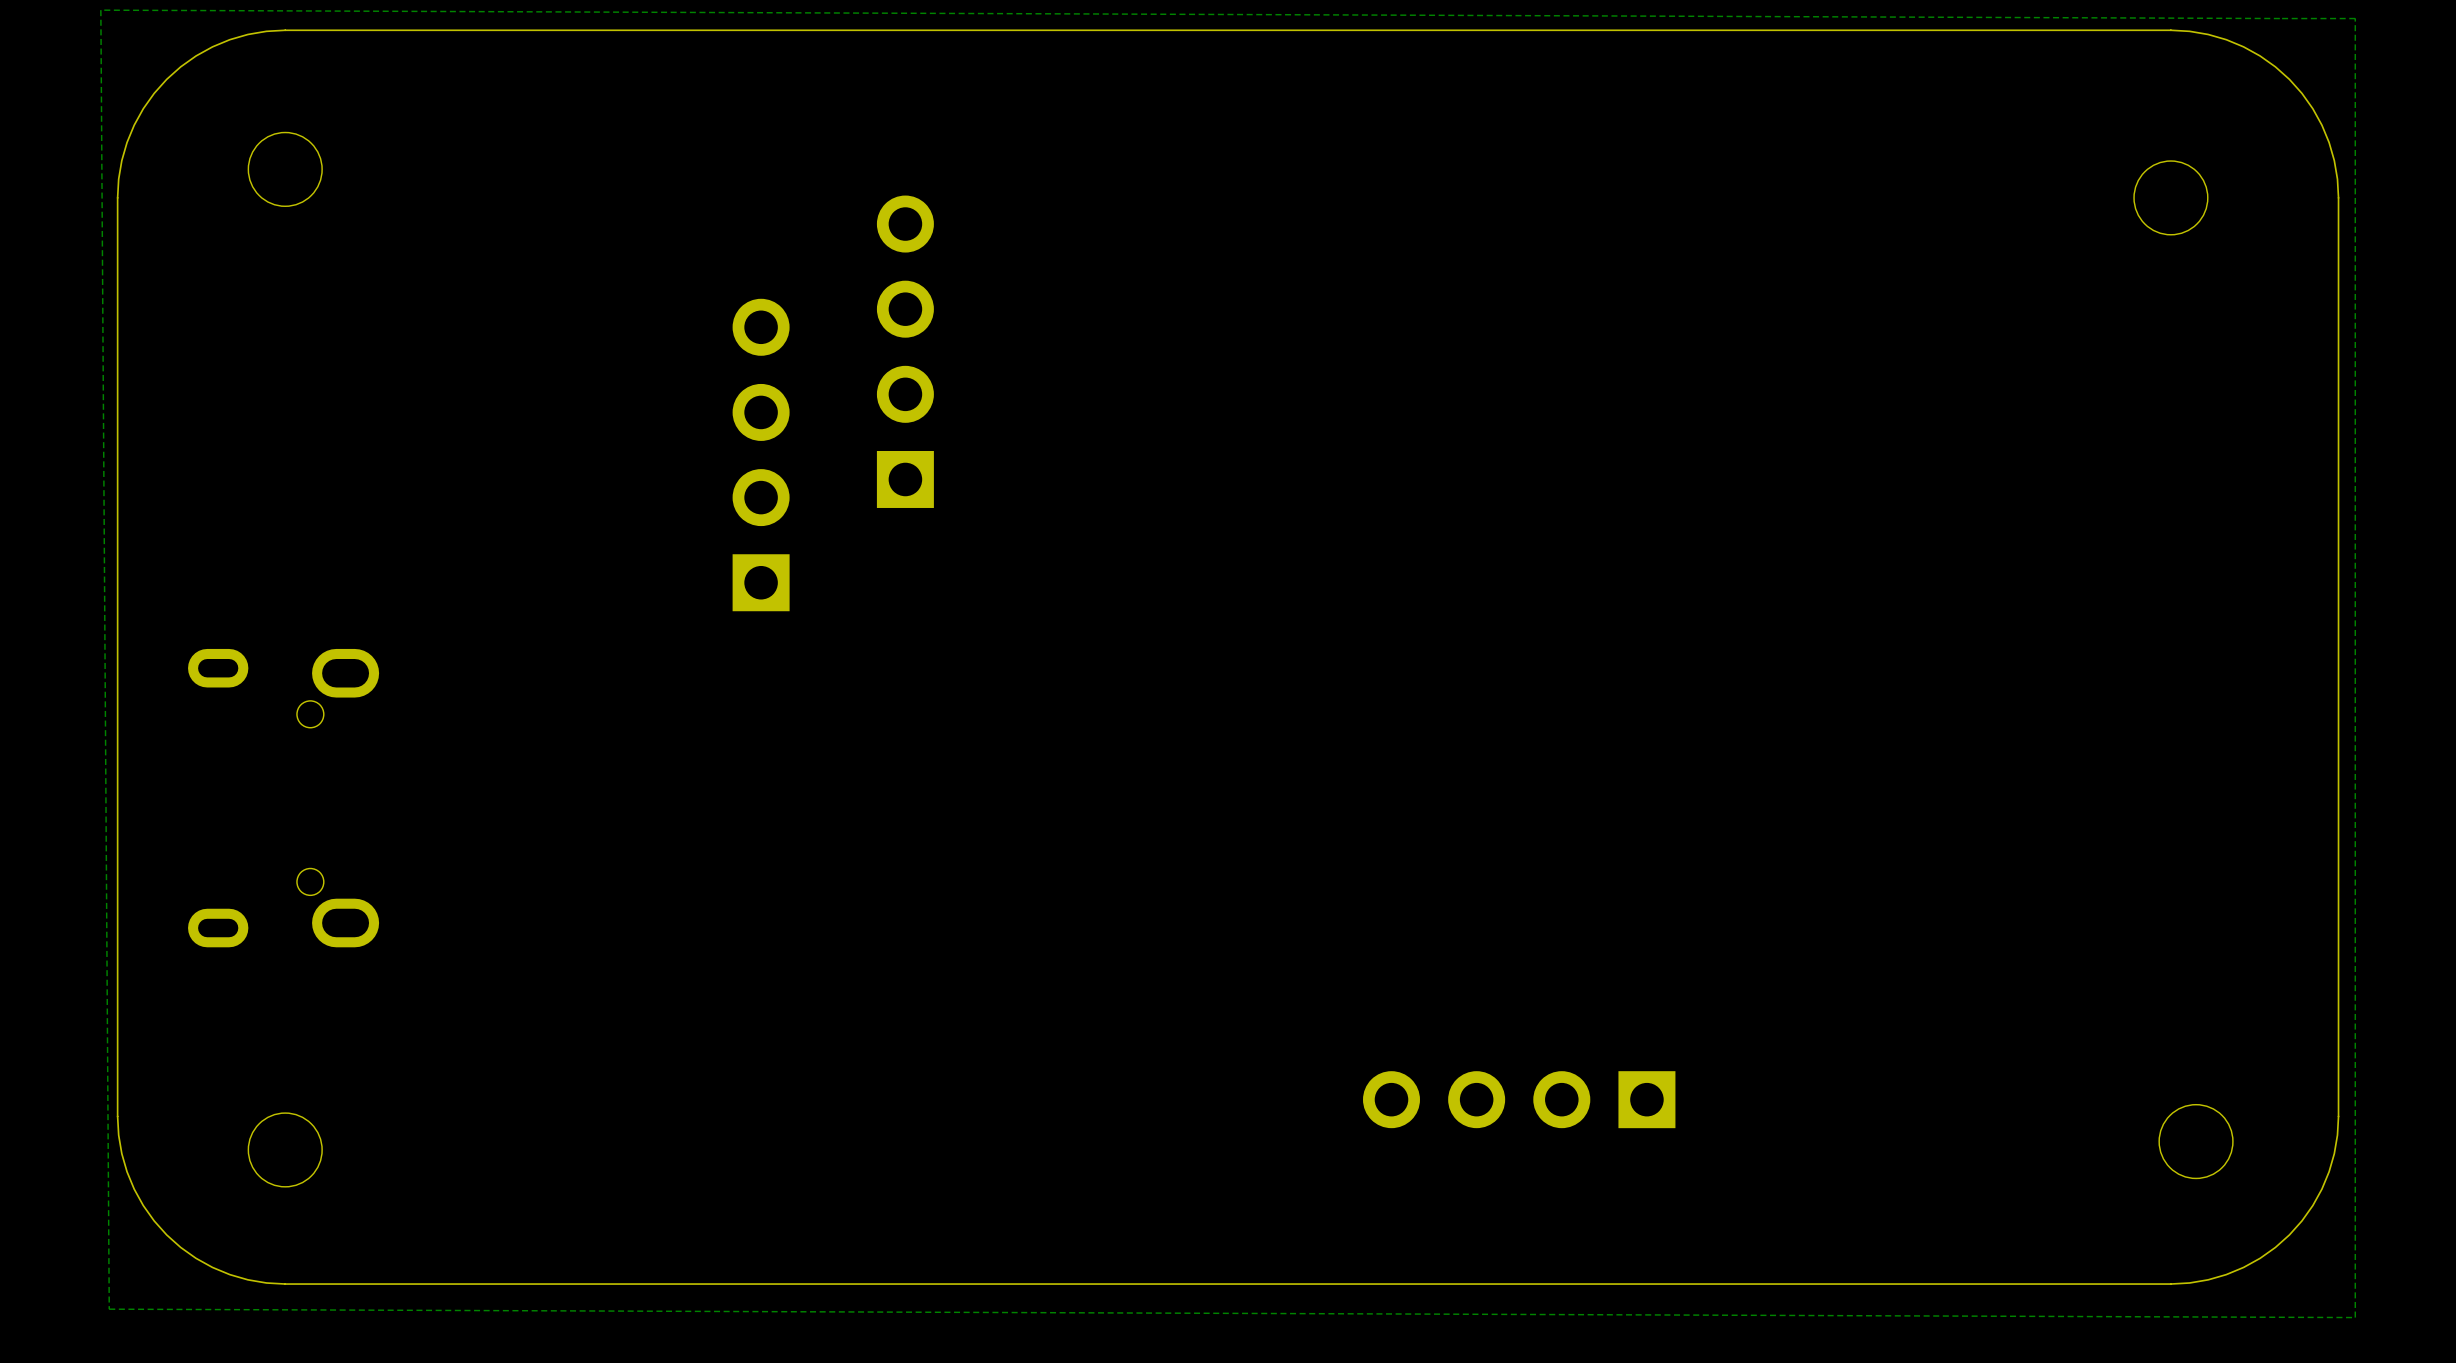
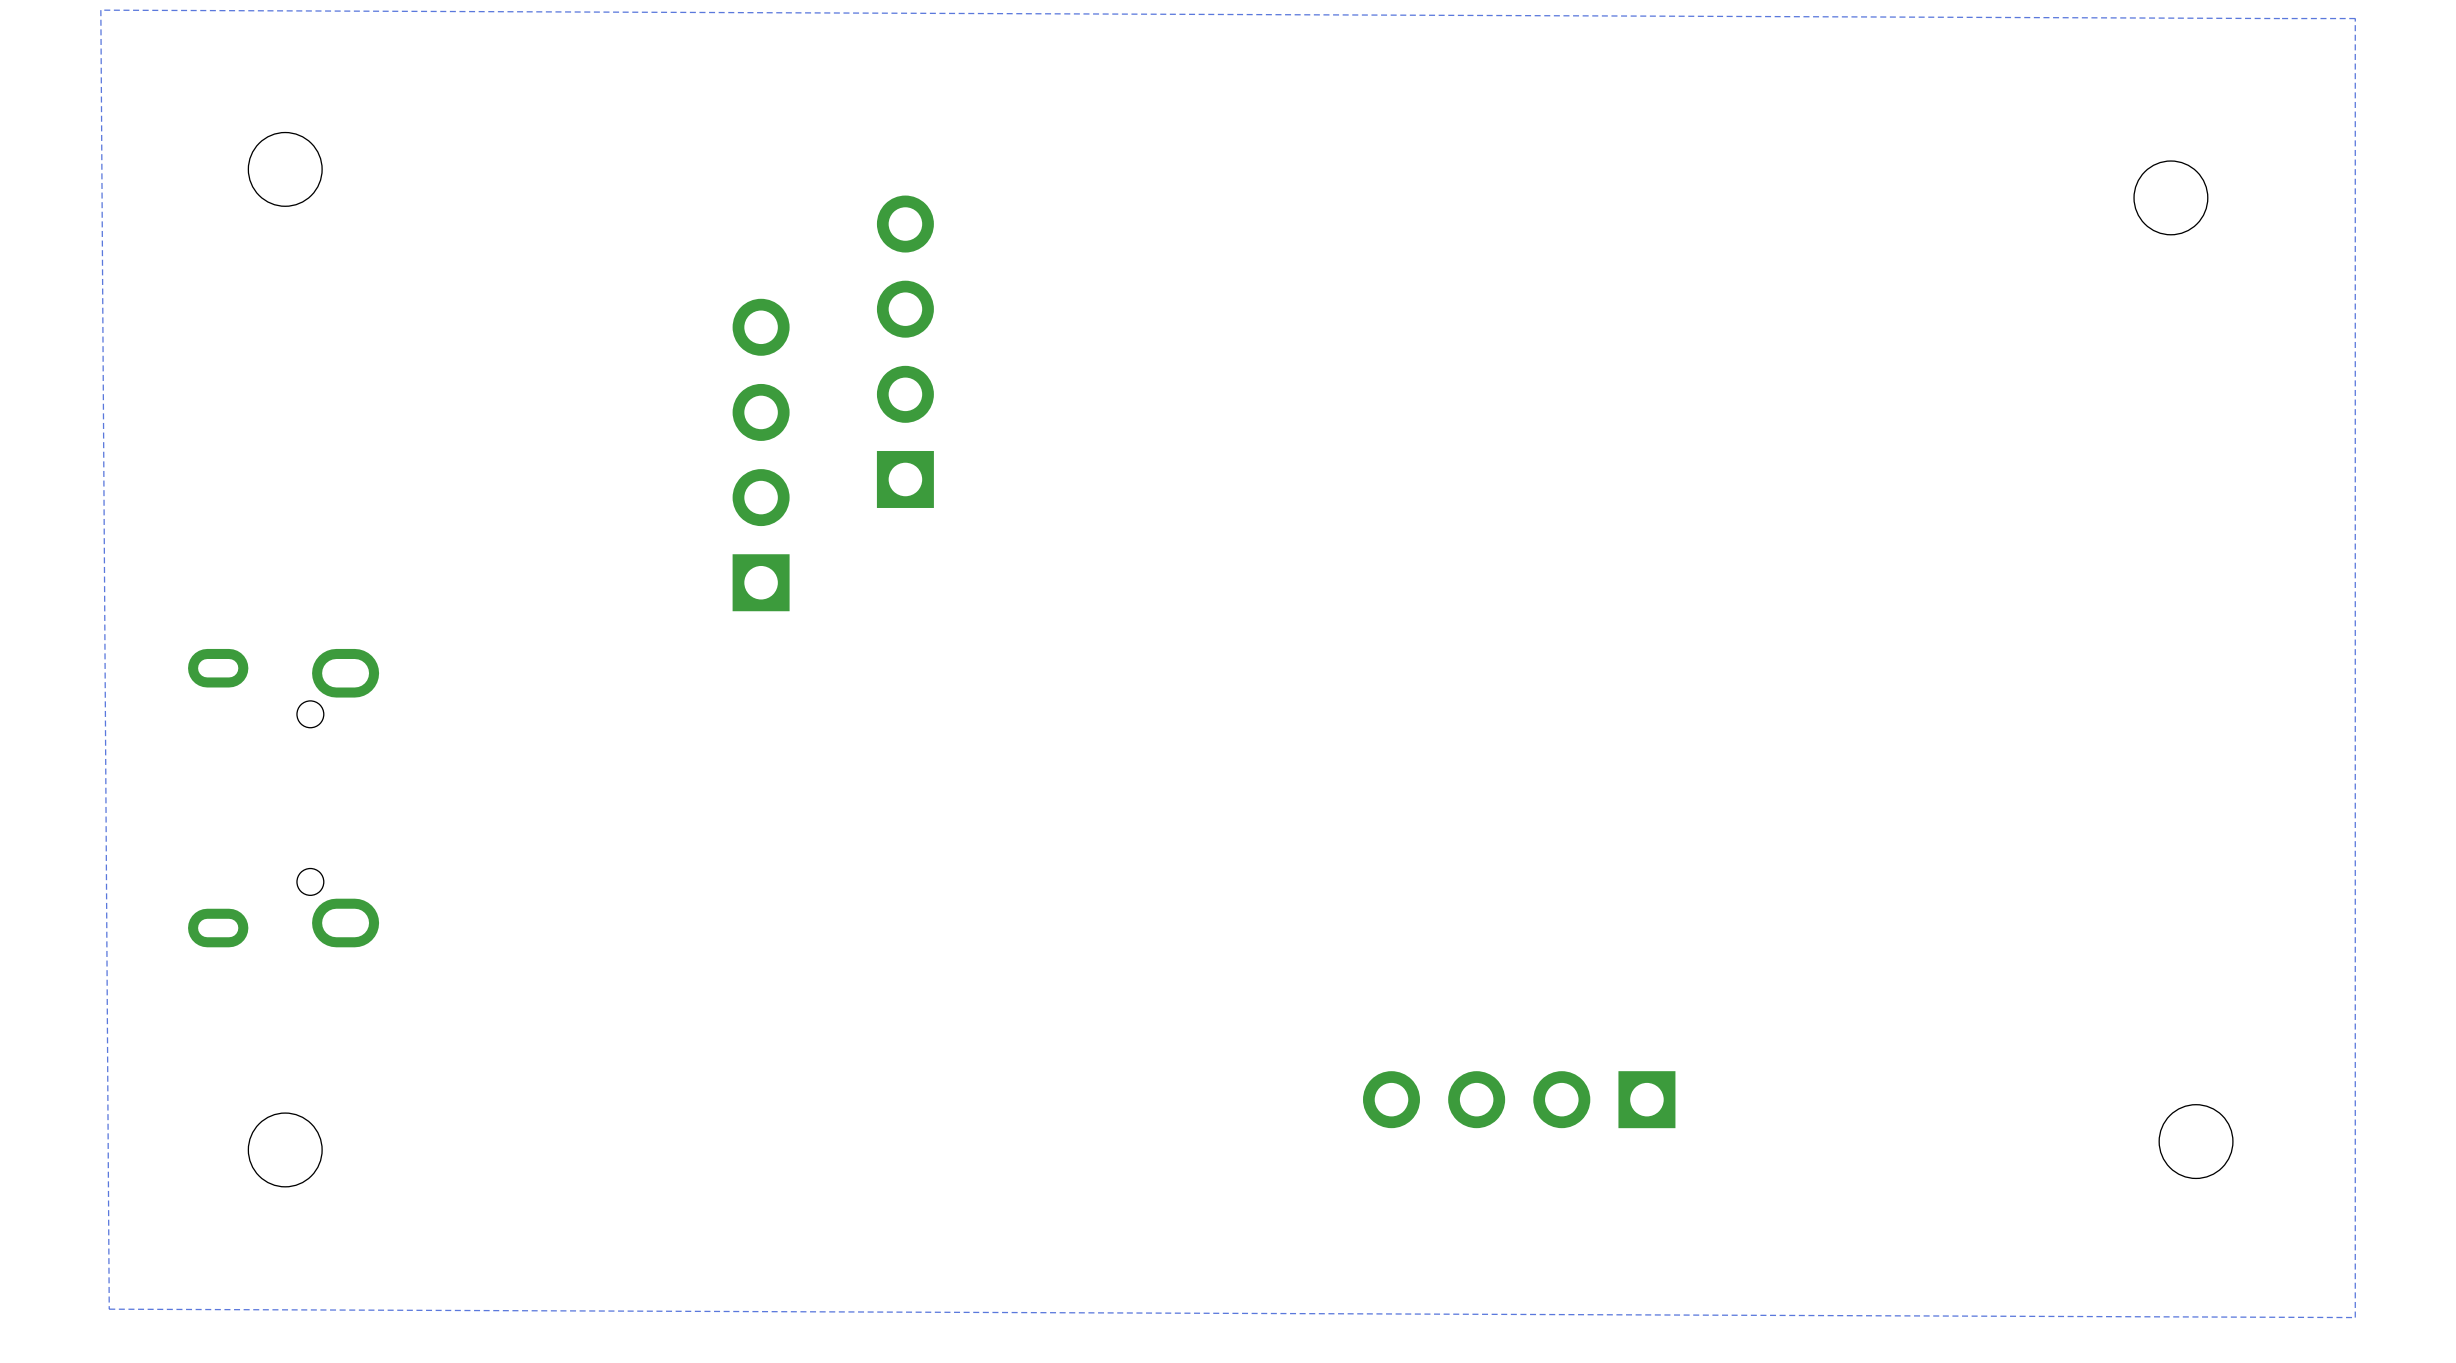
board edge: (2170, 30) (285, 30) (266, 31) (229, 39) (196, 55) (166, 79) (143, 108) (127, 142) (121, 160) (117, 197) (117, 1116) (118, 1135) (127, 1171) (143, 1205) (154, 1220) (180, 1247) (212, 1267) (247, 1279) (285, 1284) (2170, 1284) (2208, 1279) (2243, 1267) (2260, 1258) (2289, 1234) (2312, 1205) (2329, 1171) (2337, 1135) (2337, 179) (2334, 160) (2321, 125) (2301, 93) (2275, 66) (2243, 46) (2226, 39) (2189, 31) (2170, 30) -> none

